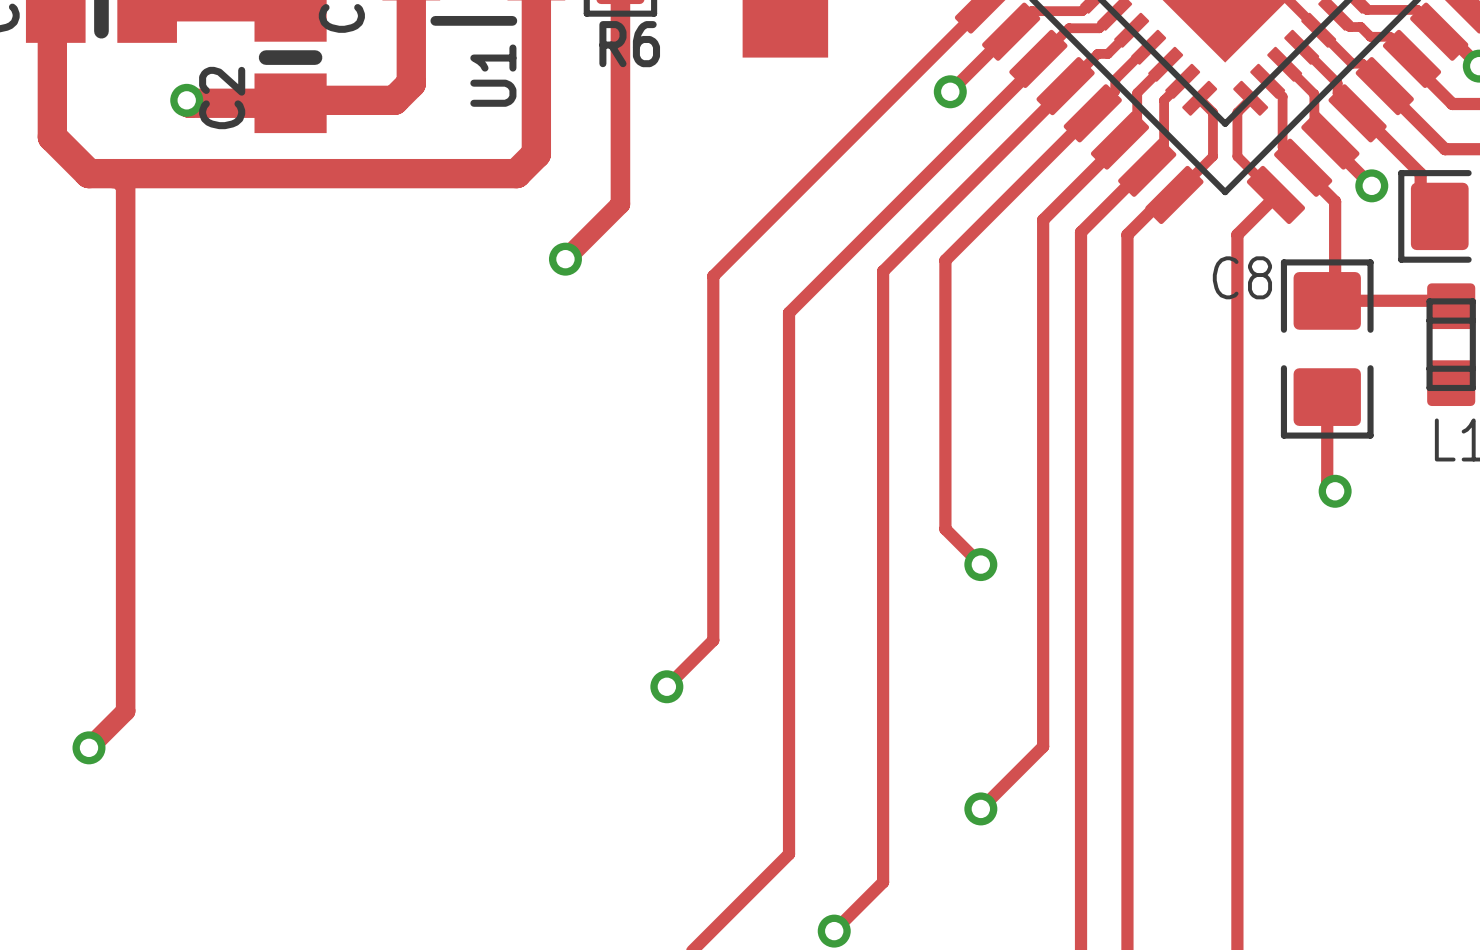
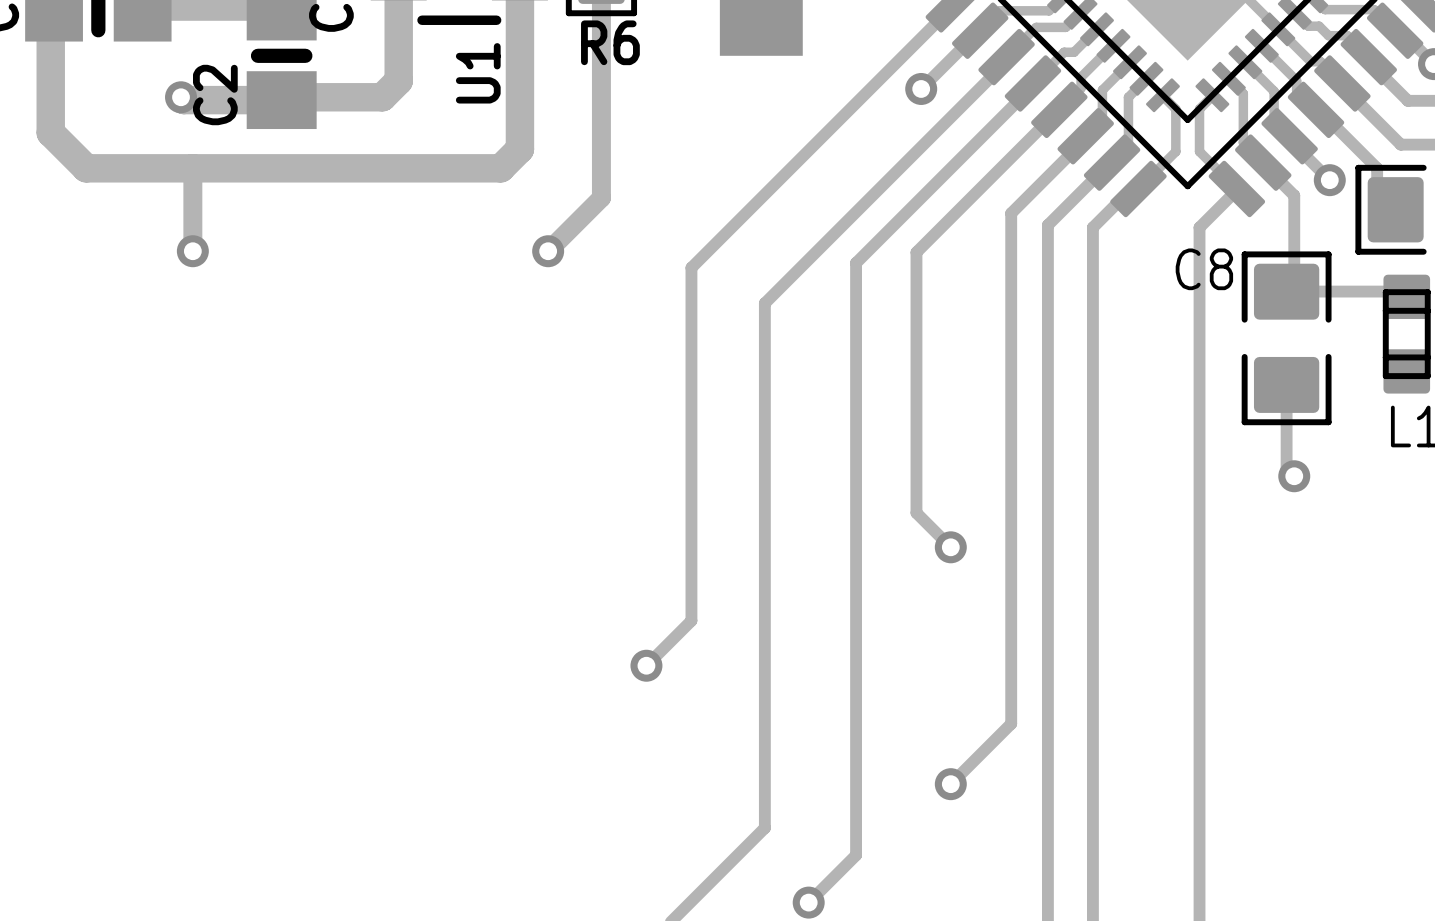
track: (113, 173) (125, 185) (125, 711) (88, 747) -> none
track: none -> (192, 168) (192, 251)
via: none -> (192, 251)
via: (88, 747) -> none

